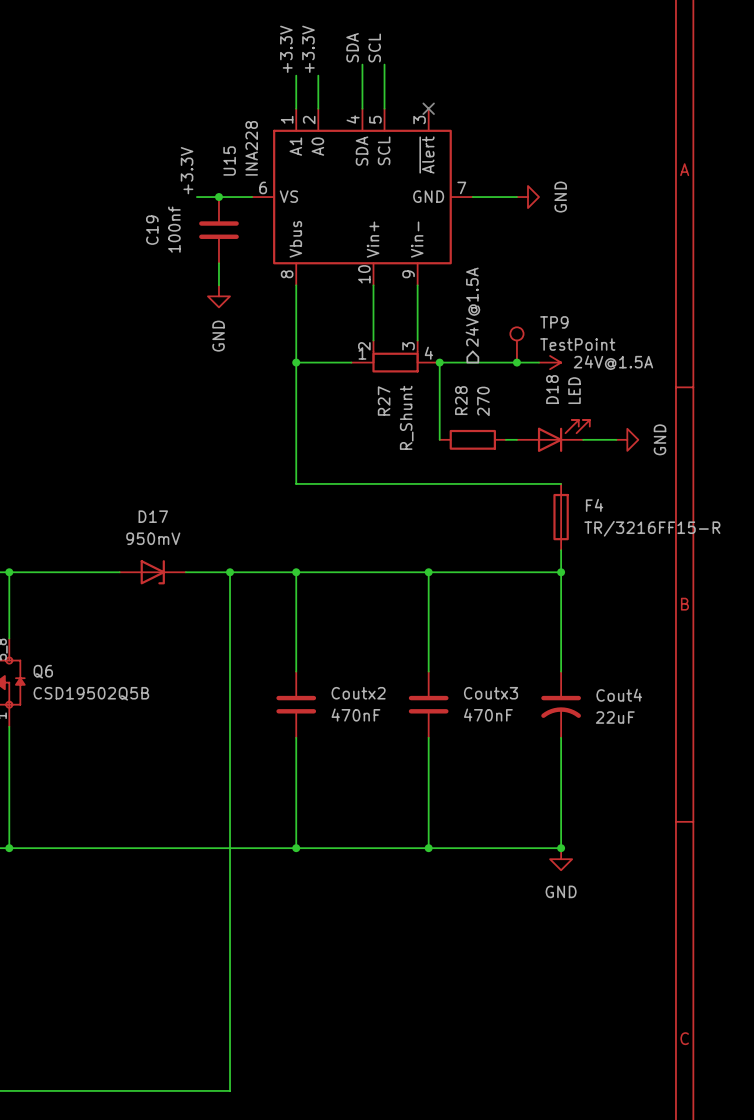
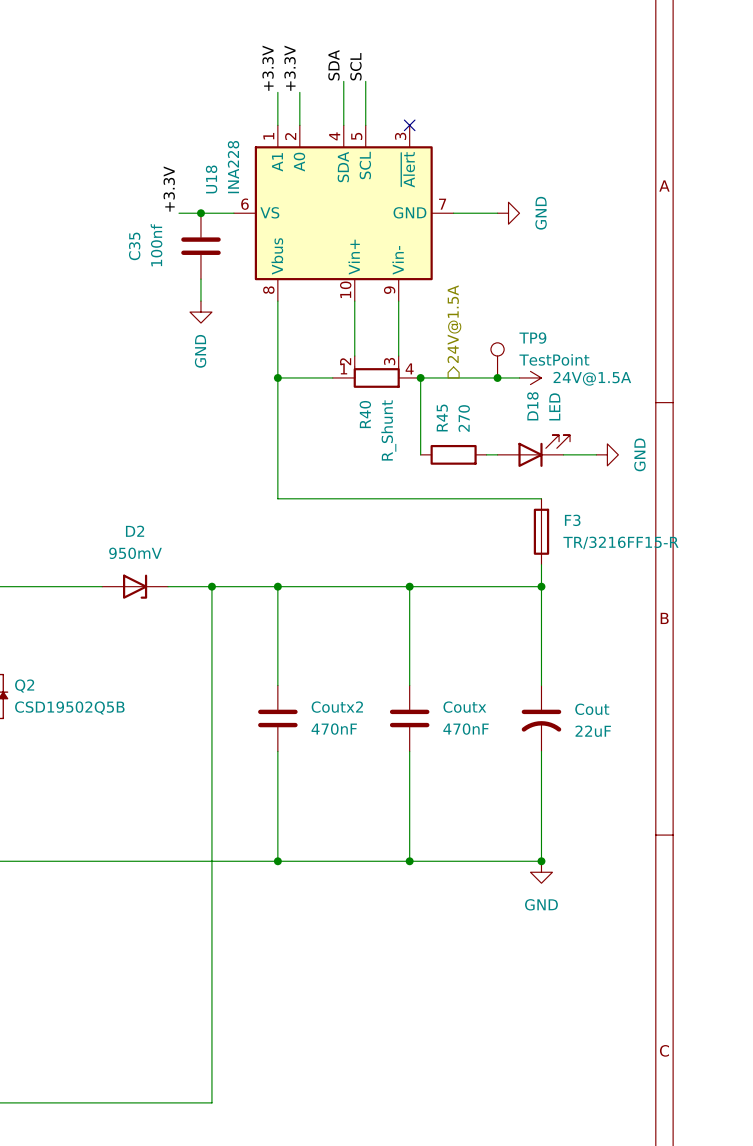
U15 name: U15 (229, 160) -> U18 (211, 179)
C19 name: C19 (152, 230) -> C35 (134, 246)
R28 name: R28 (461, 400) -> R45 (442, 418)
R27 name: R27 (384, 401) -> R40 (365, 414)
F4 name: F4 (594, 505) -> F3 (572, 520)
D17 name: D17 (153, 516) -> D2 (135, 531)
Q6 name: Q6 (43, 671) -> Q2 (24, 685)
Coutx3 name: Coutx3 (491, 693) -> Coutx (464, 707)
Cout4 name: Cout4 (619, 695) -> Cout (592, 709)

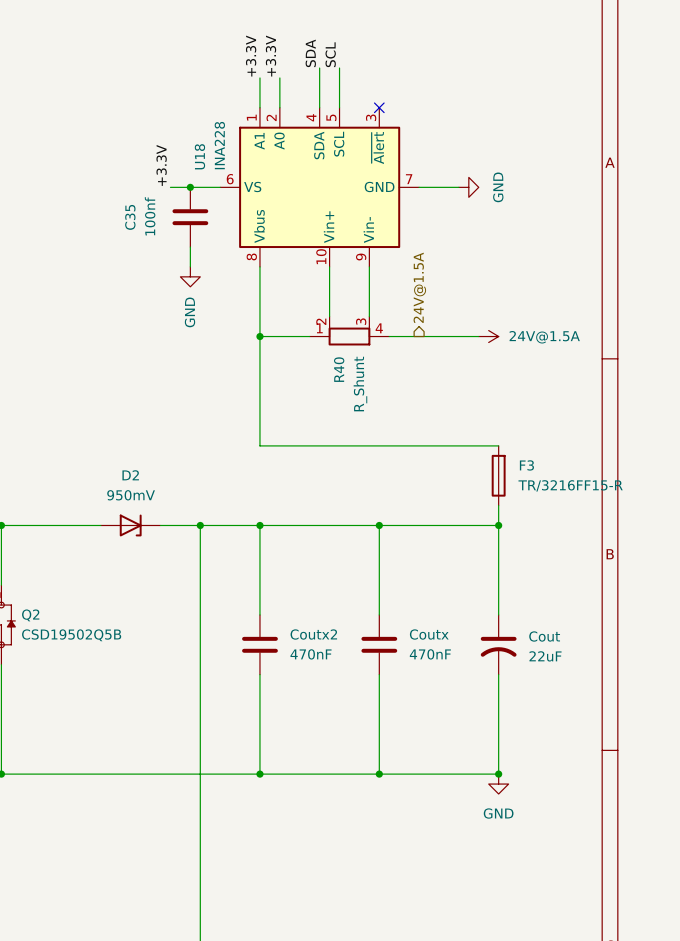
TP9: TestPoint (497, 360) -> none
wire: (420, 377) (420, 454) -> none
junction: (420, 377) -> none
junction: (497, 377) -> none
D18: LED (533, 451) -> none
R45: 270 (453, 454) -> none
wire: (486, 454) (497, 454) -> none
wire: (563, 454) (596, 454) -> none
power symbol: GND (607, 454) -> none

